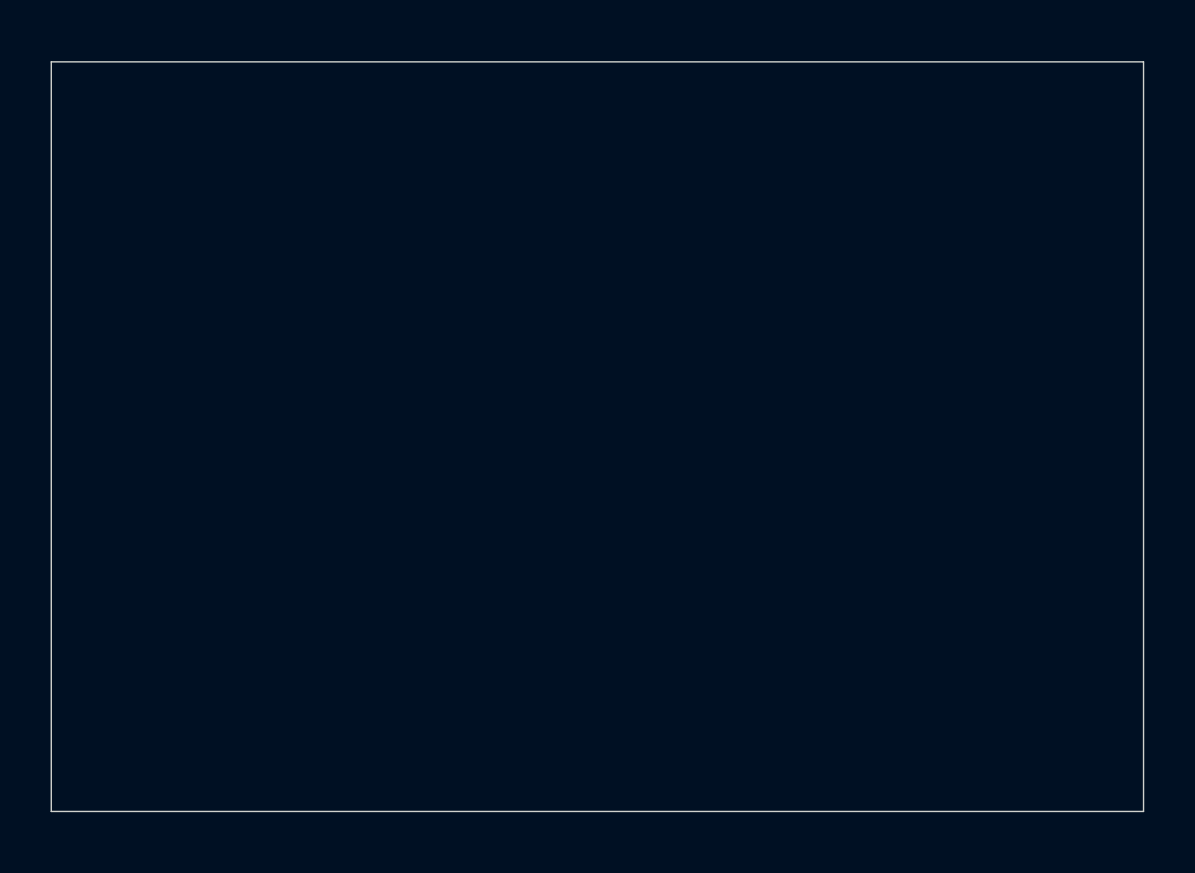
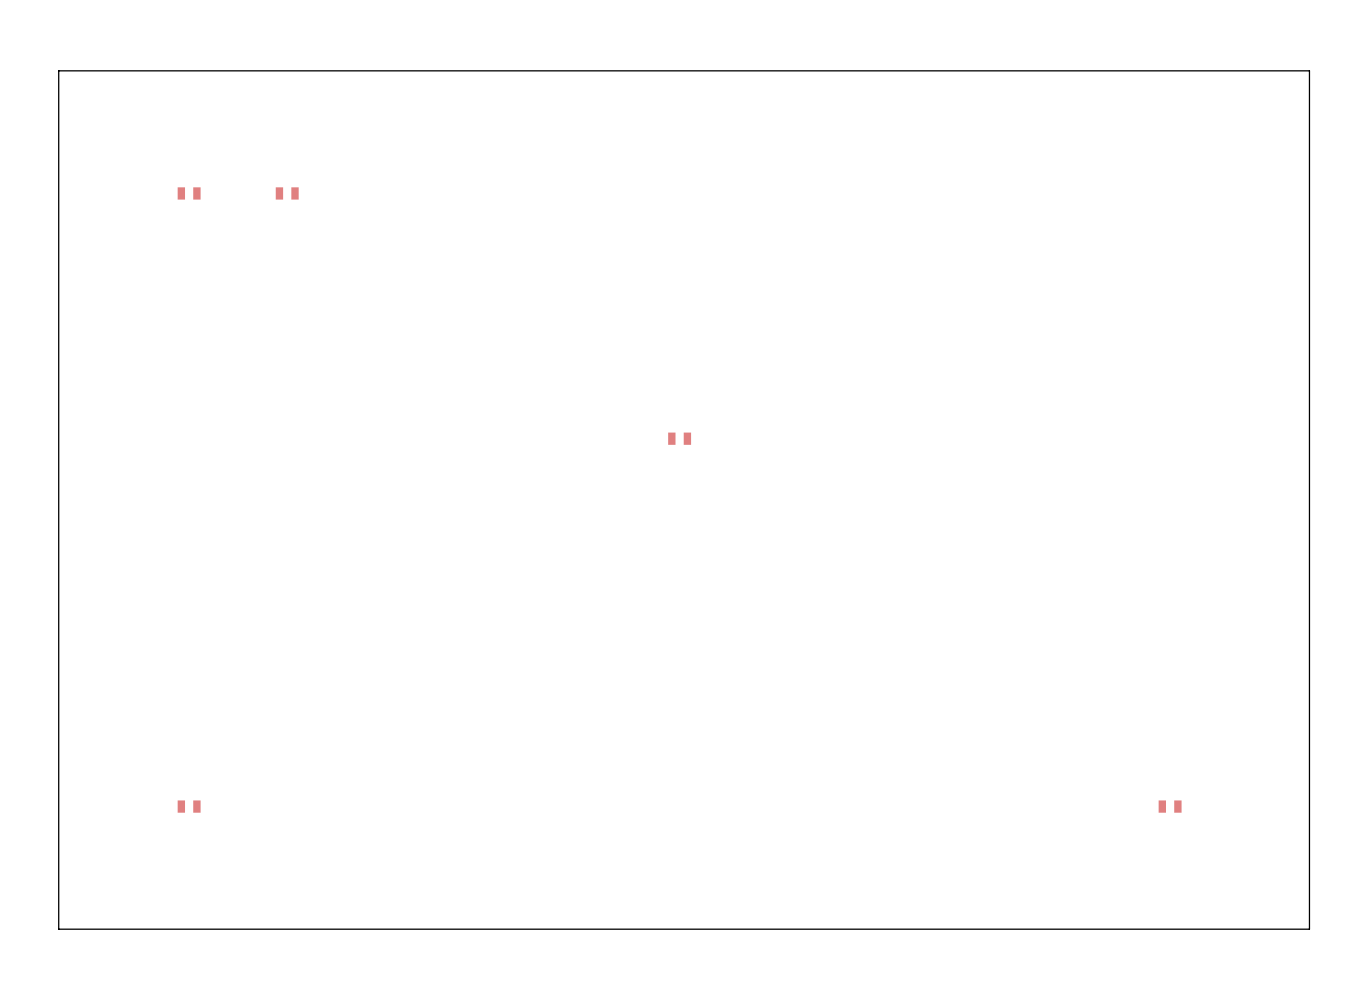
part: none -> (189, 193)
part: none -> (287, 193)
part: none -> (679, 438)
part: none -> (189, 806)
part: none -> (1170, 806)

